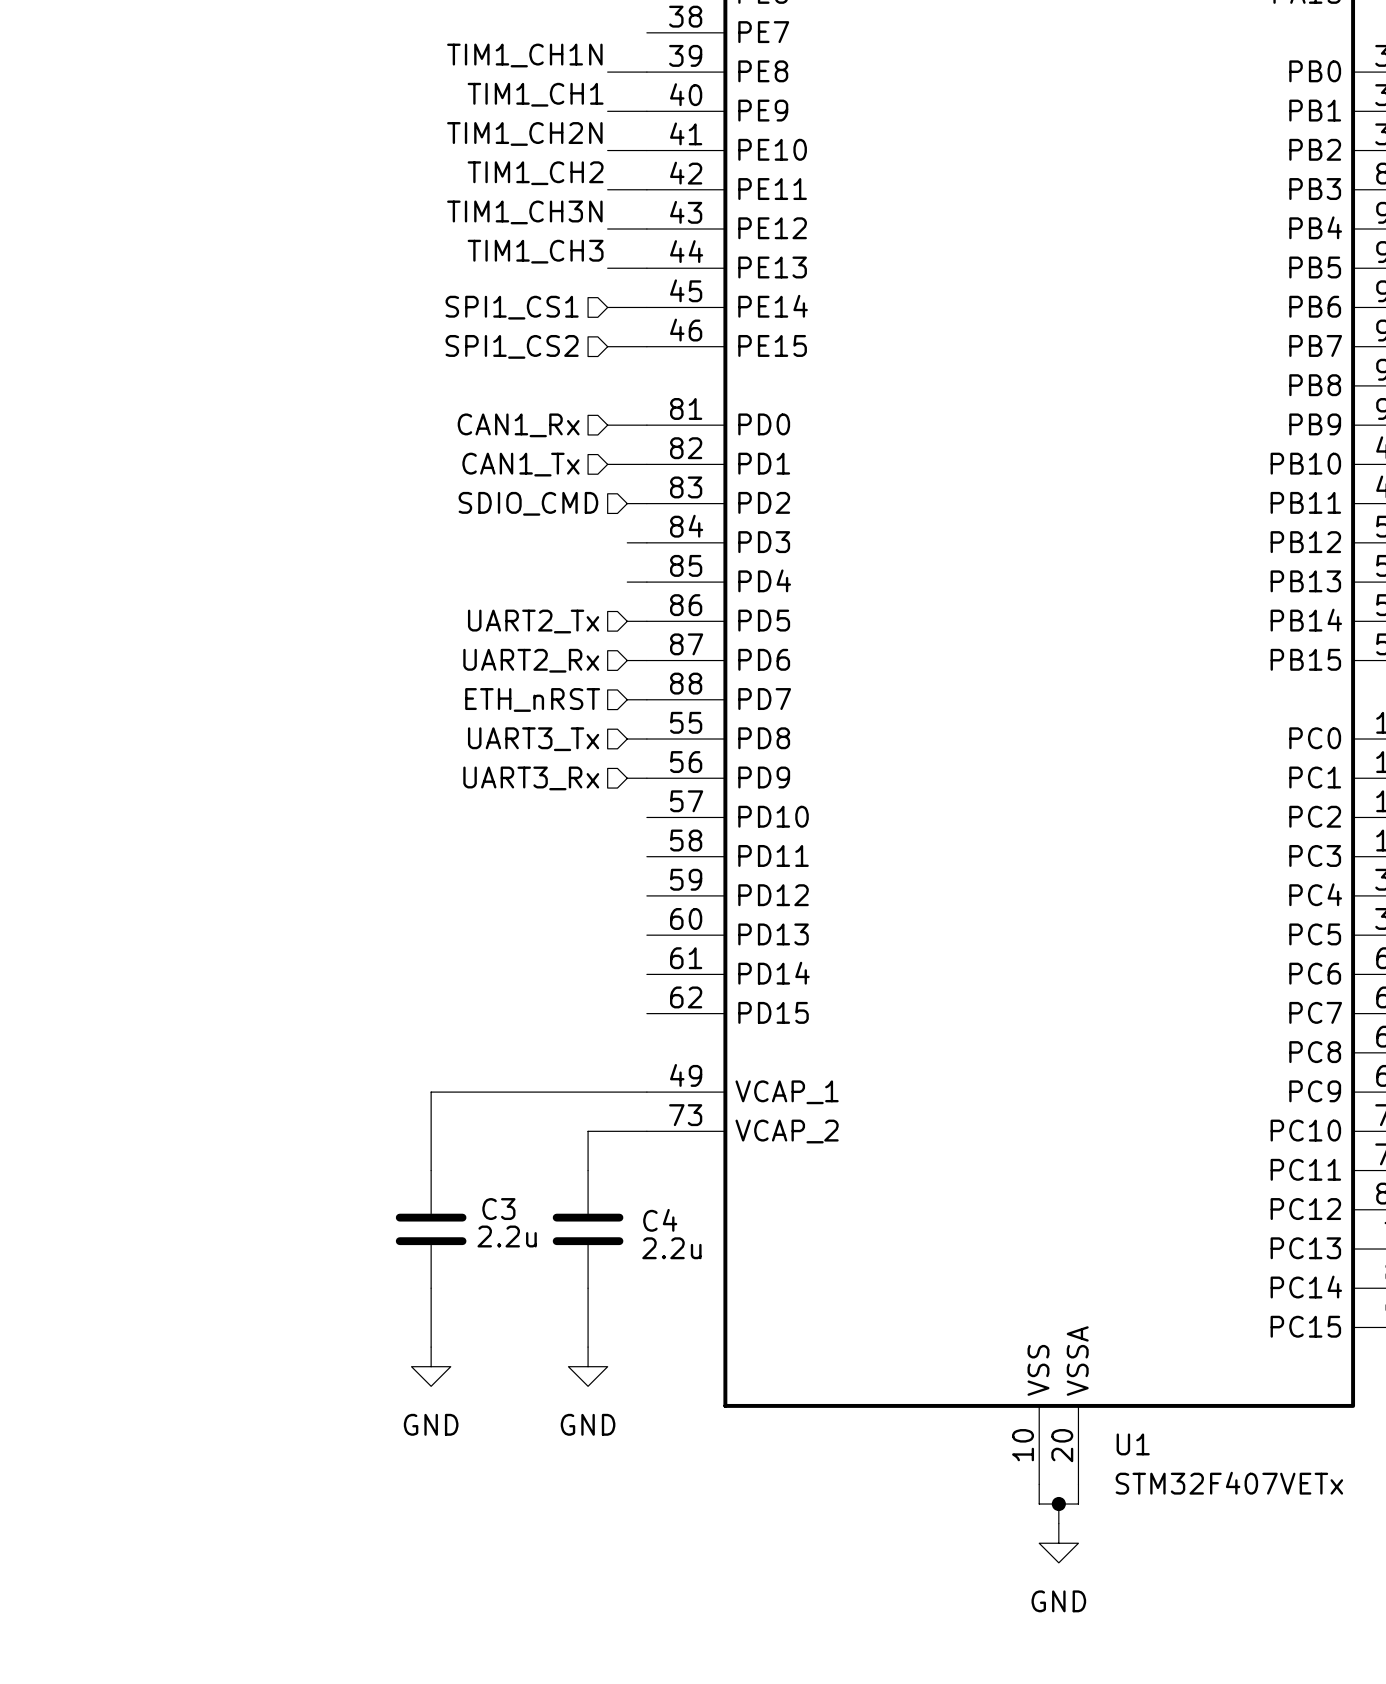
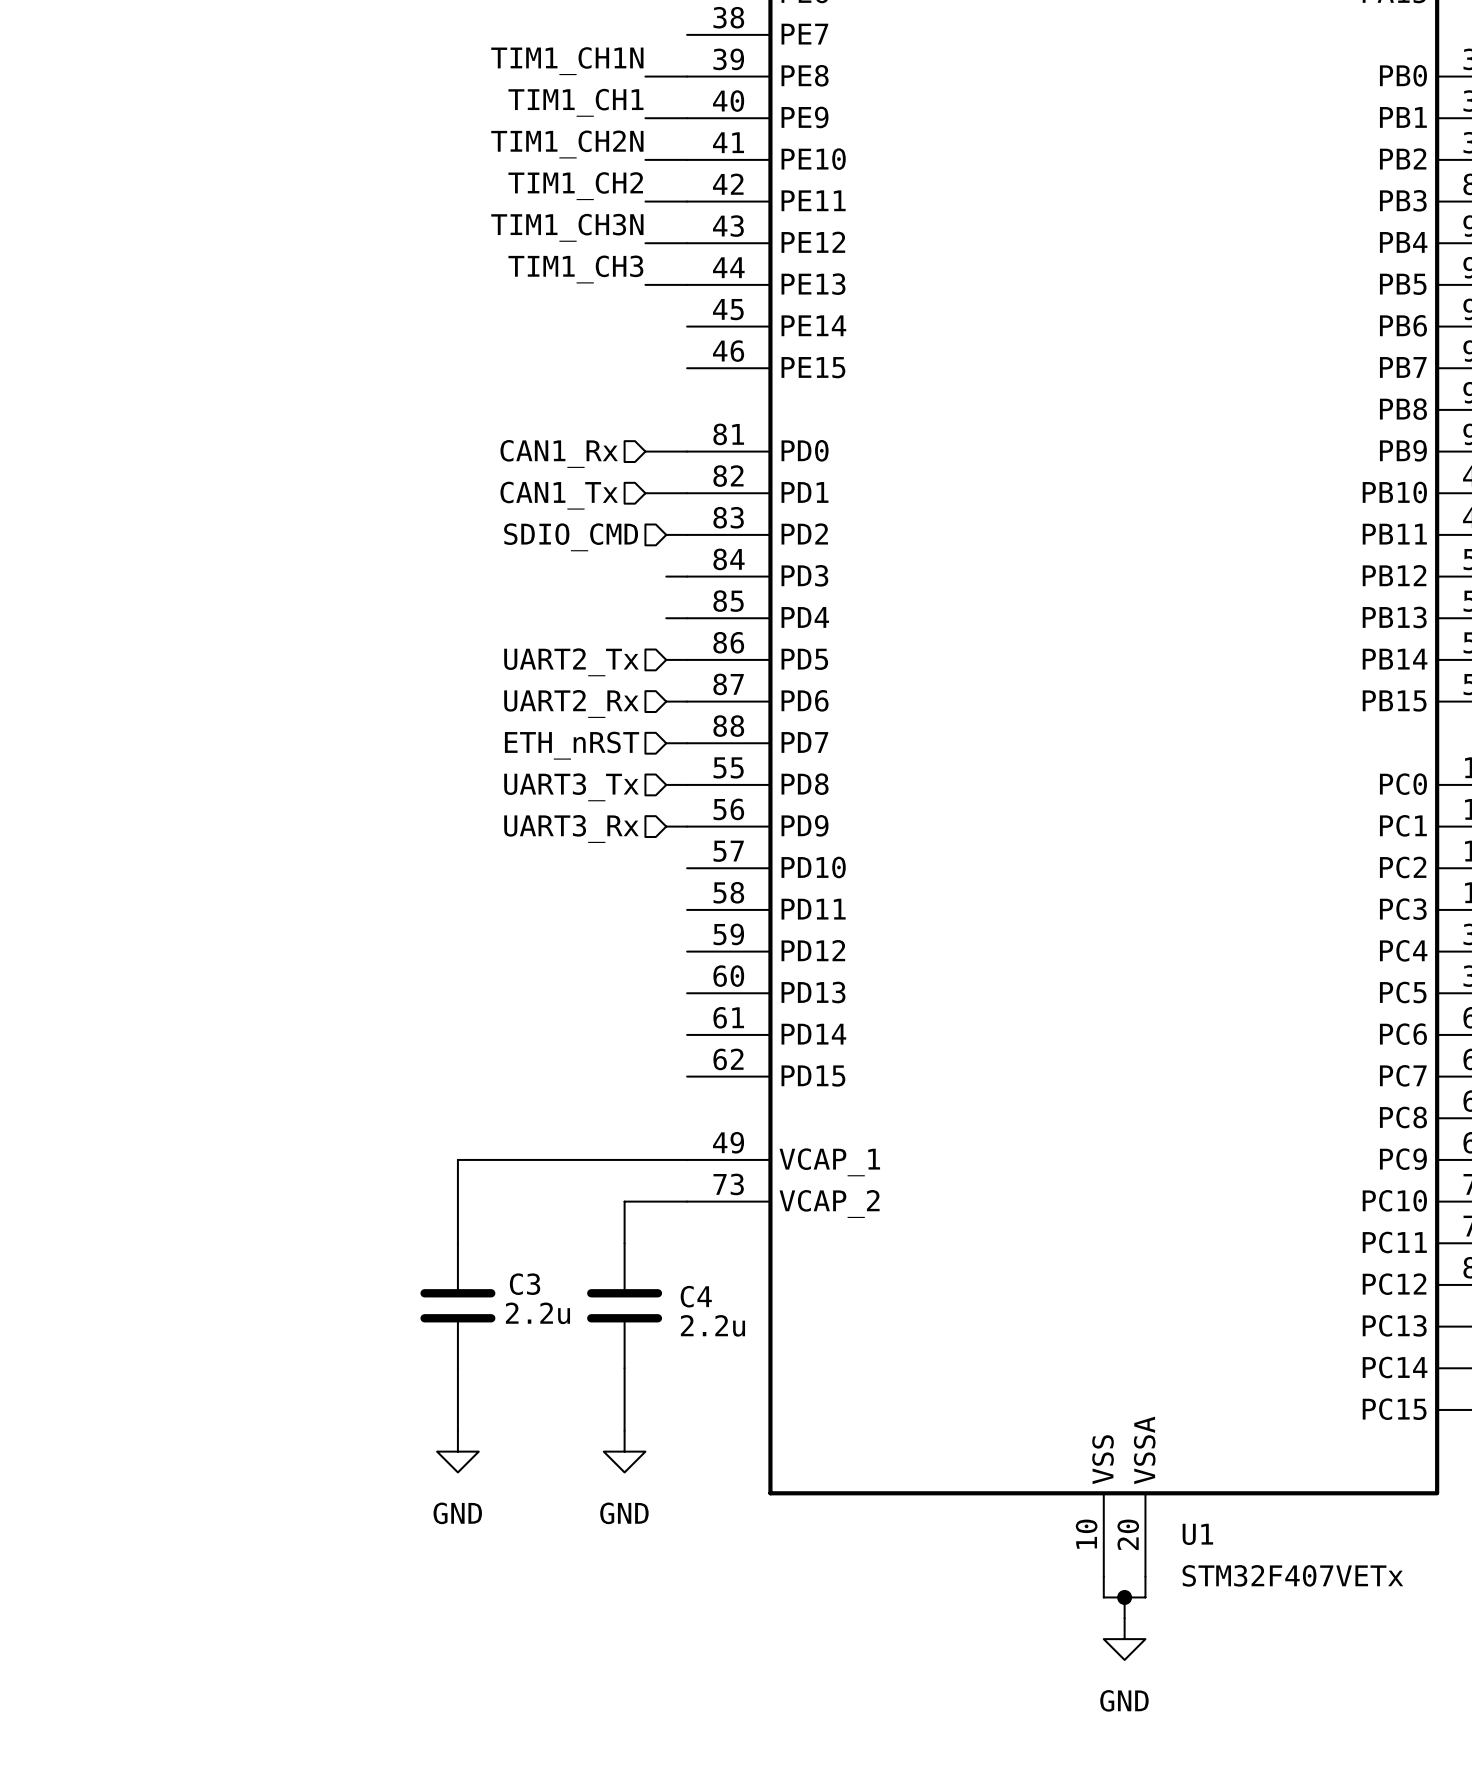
hierarchical label: SPI1_CS1 (512, 307) -> none
wire: (607, 307) (646, 307) -> none
hierarchical label: SPI1_CS2 (512, 346) -> none
wire: (607, 346) (646, 346) -> none

